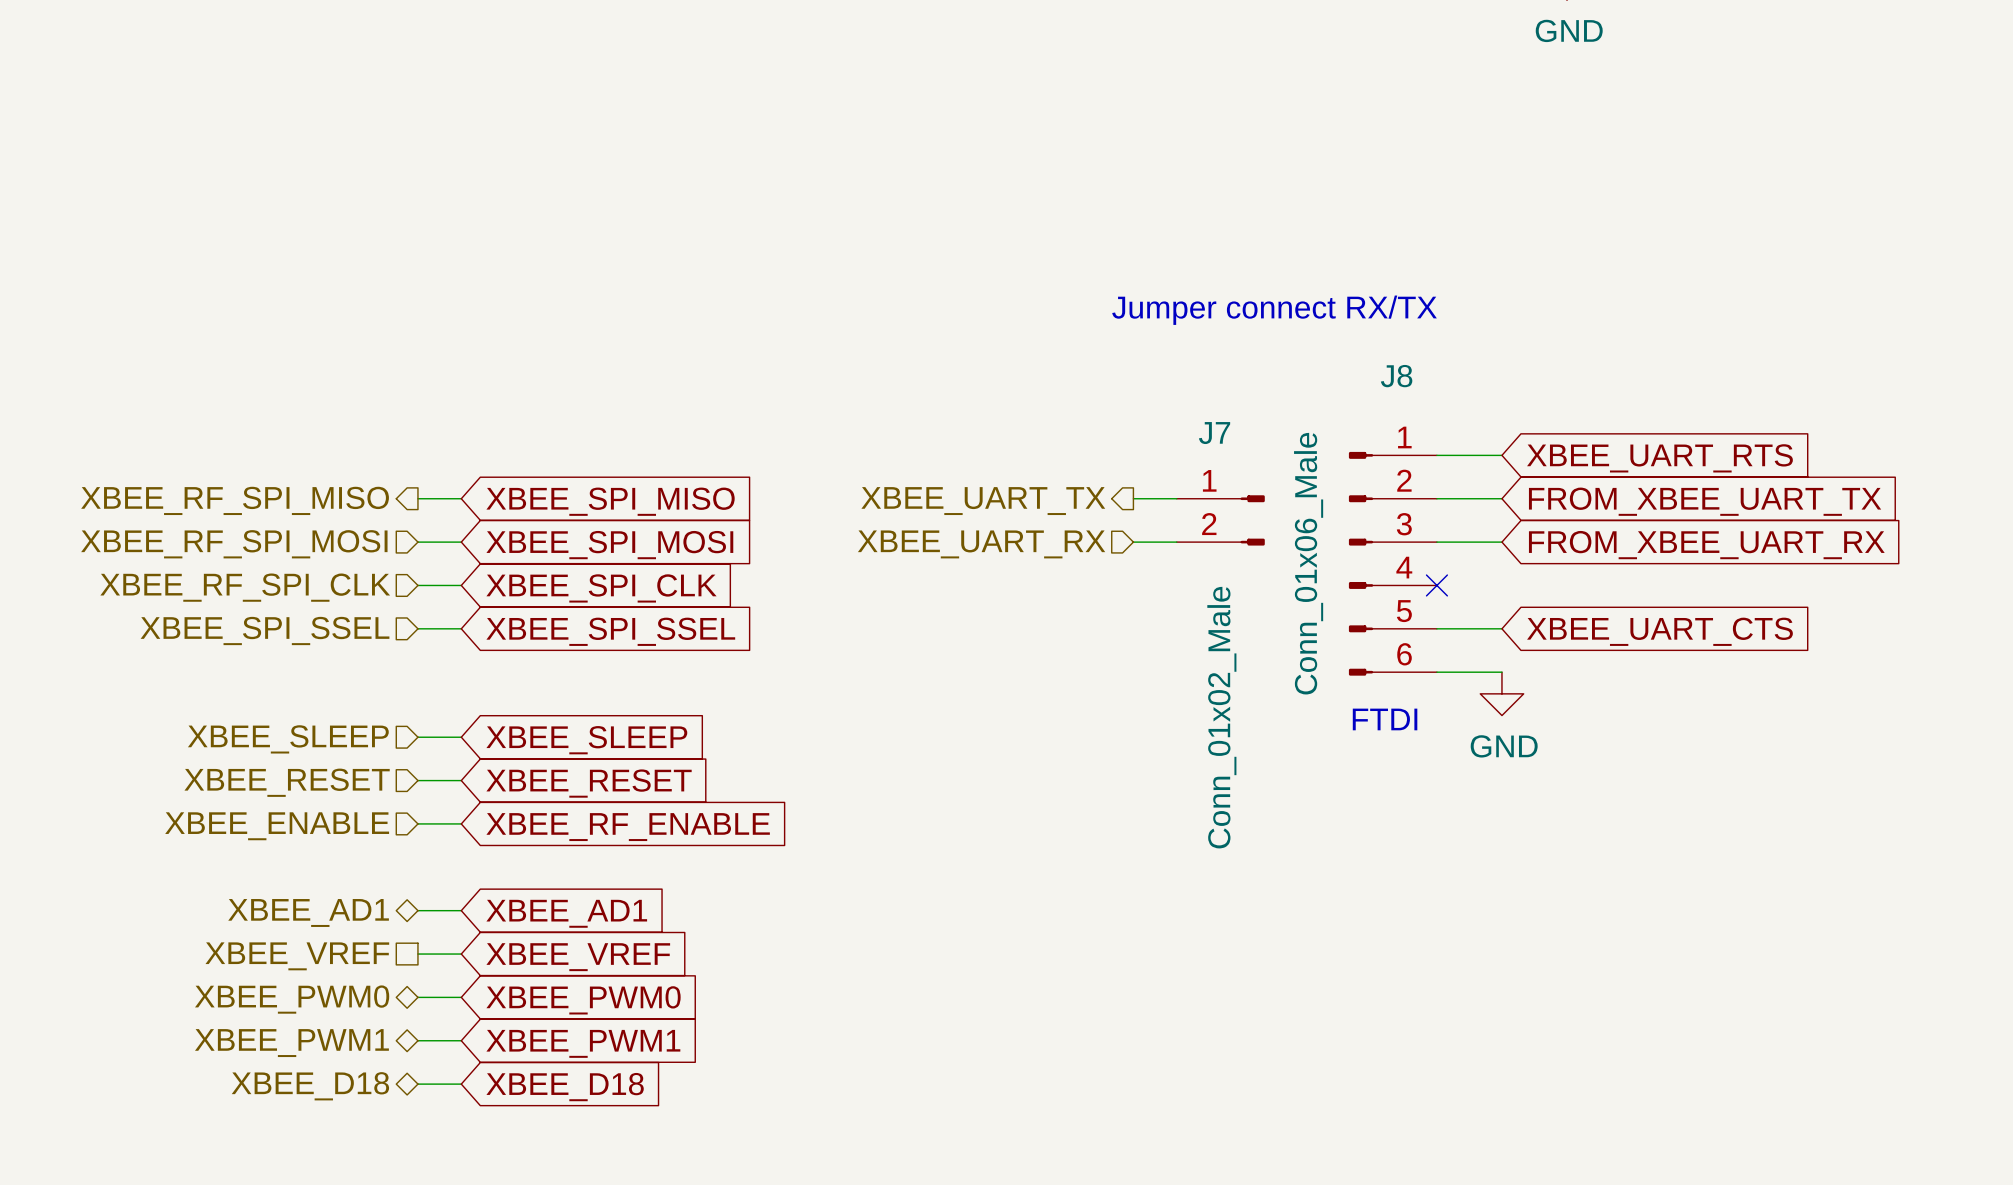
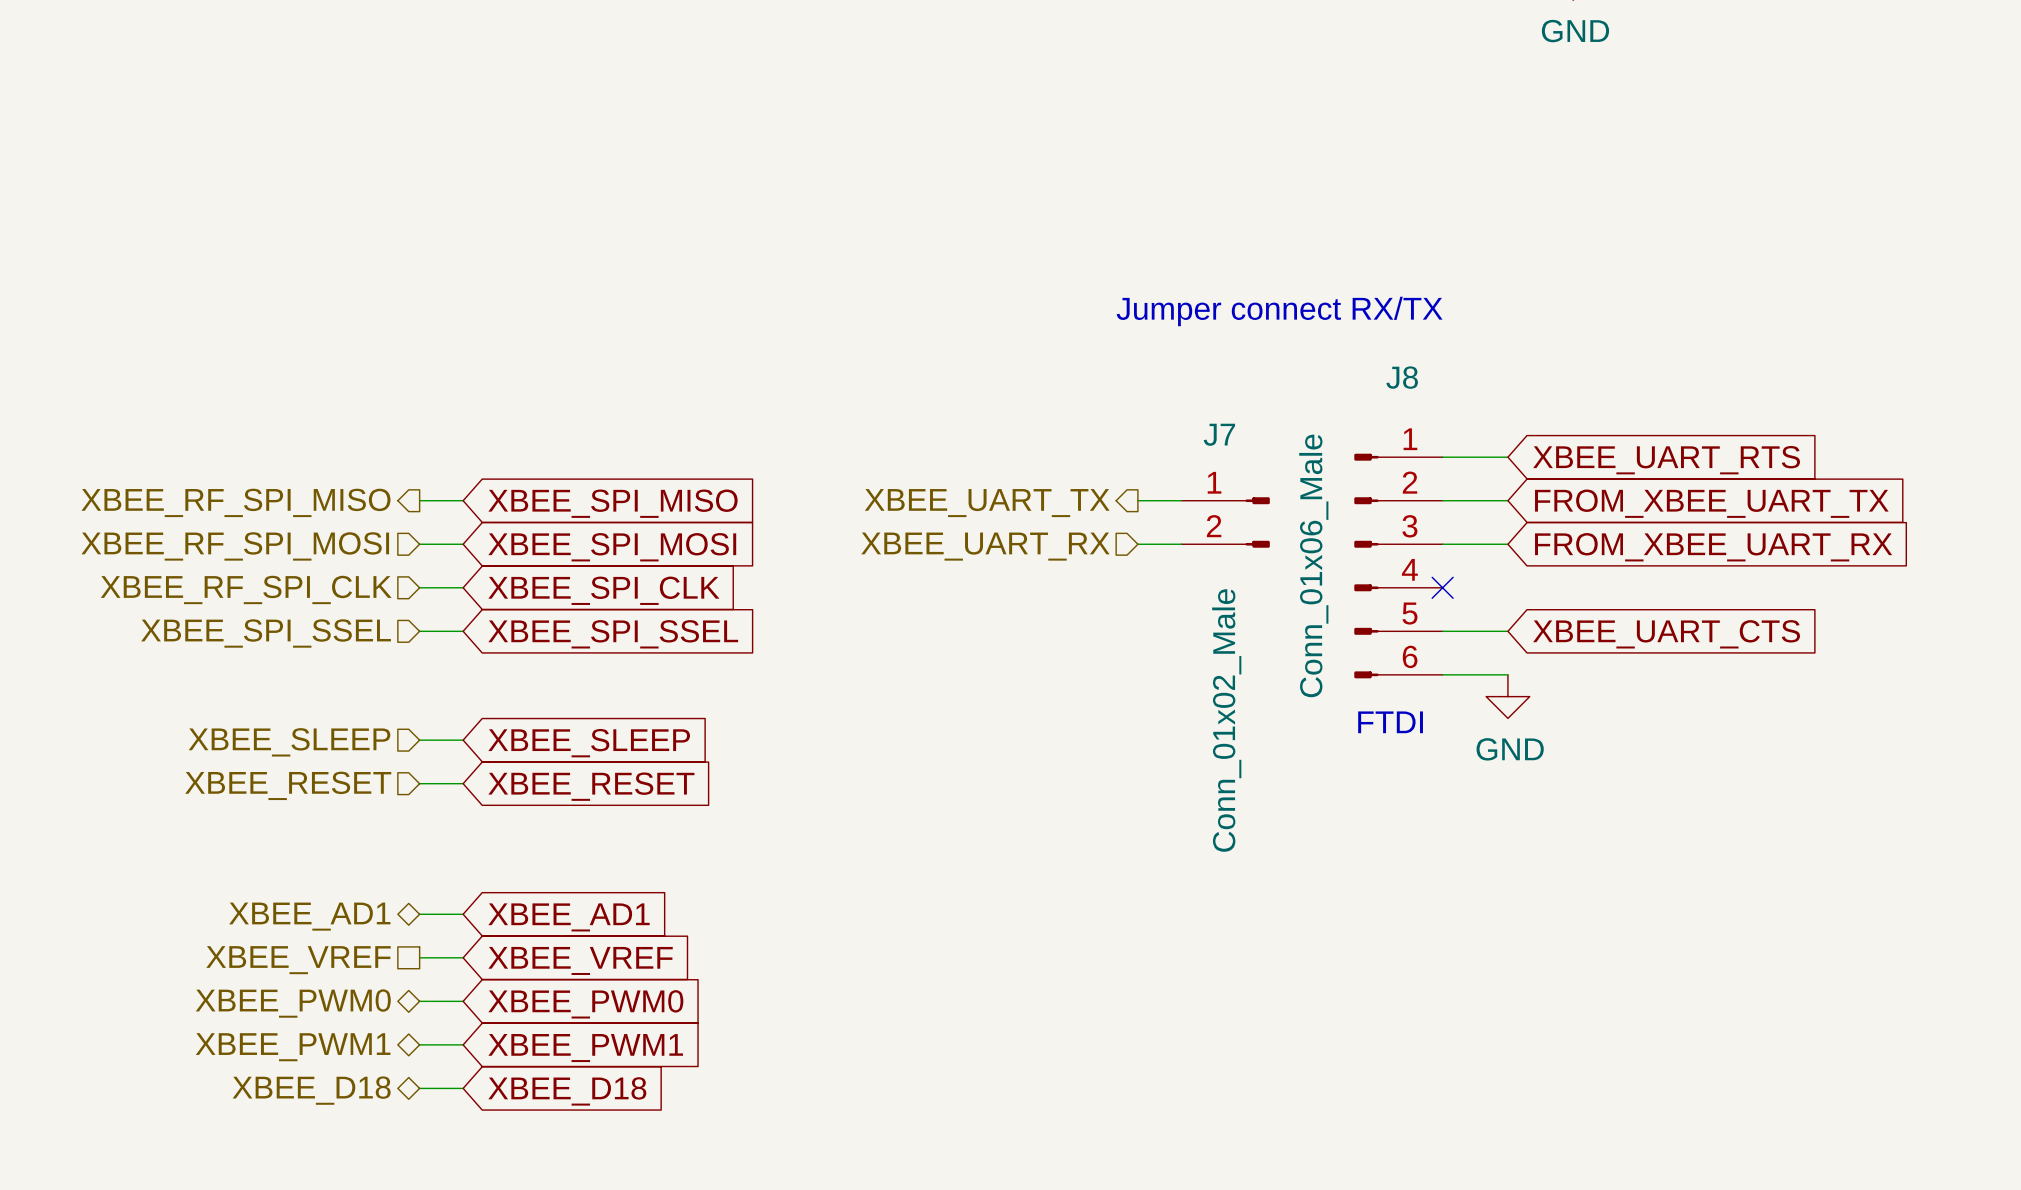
wire: (417, 823) (461, 823) -> none
hierarchical label: XBEE_ENABLE (277, 826) -> none
global label: XBEE_RF_ENABLE (628, 827) -> none

